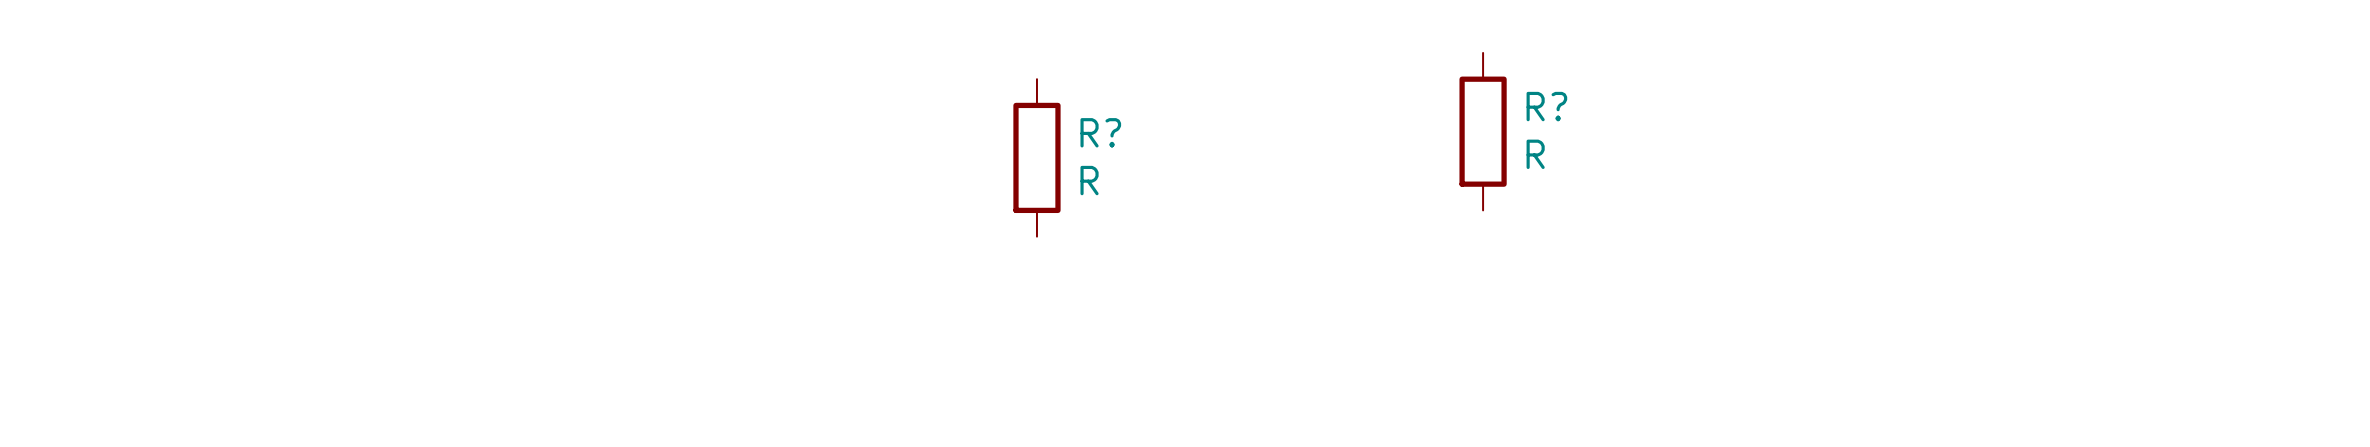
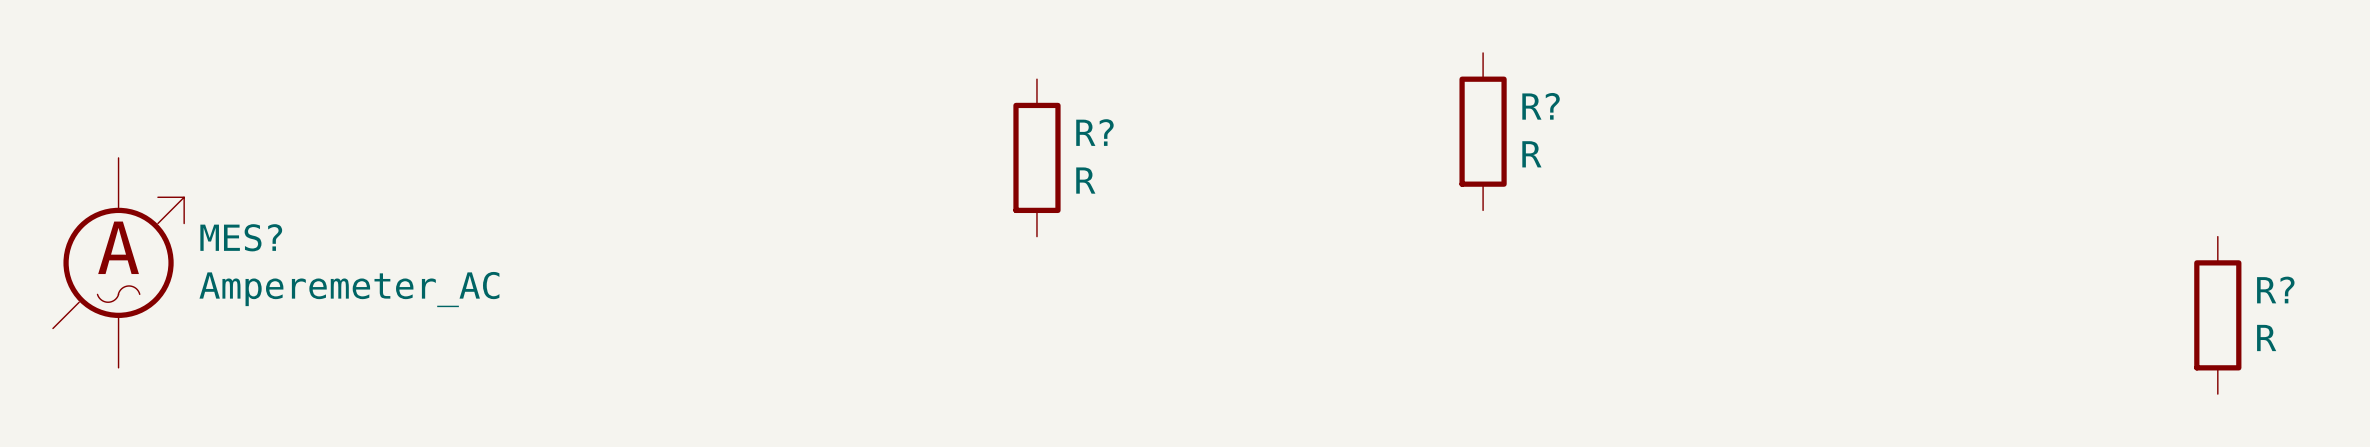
MES?: none -> Amperemeter_AC (118, 262)
R?: none -> R (2217, 315)

